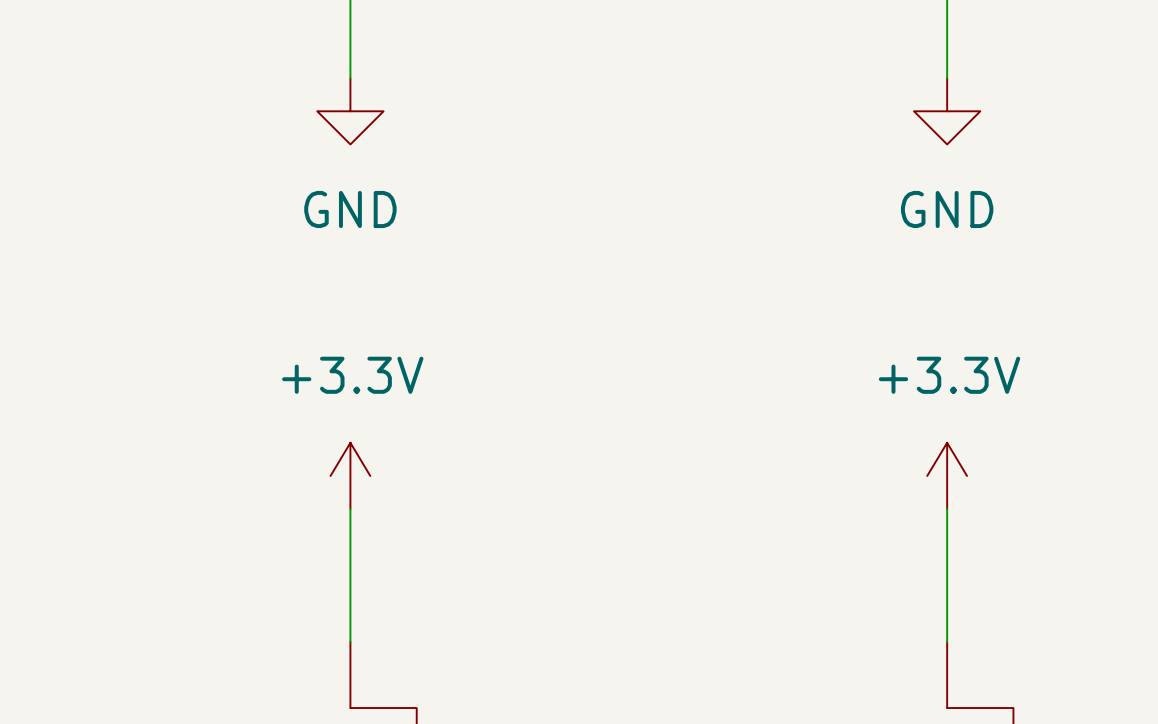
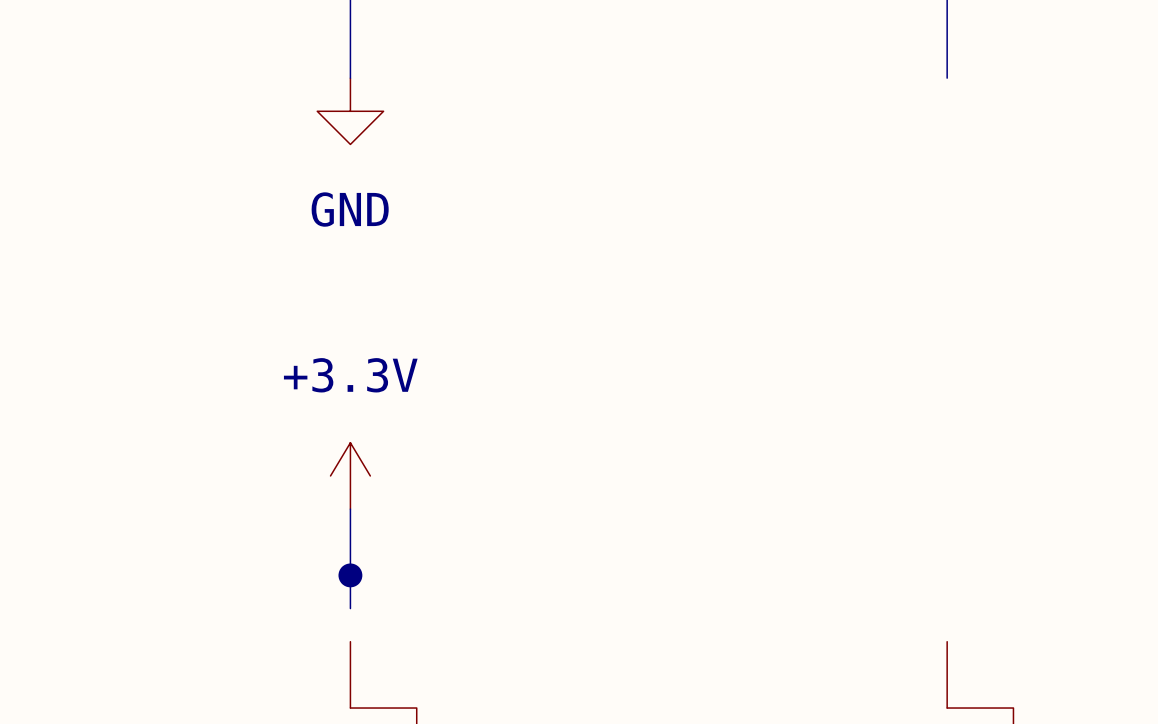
power symbol: GND (947, 111) -> none
power symbol: +3.3V (947, 475) -> none
wire: (947, 509) (947, 641) -> none
junction: none -> (350, 575)
wire: (350, 608) (350, 641) -> none

